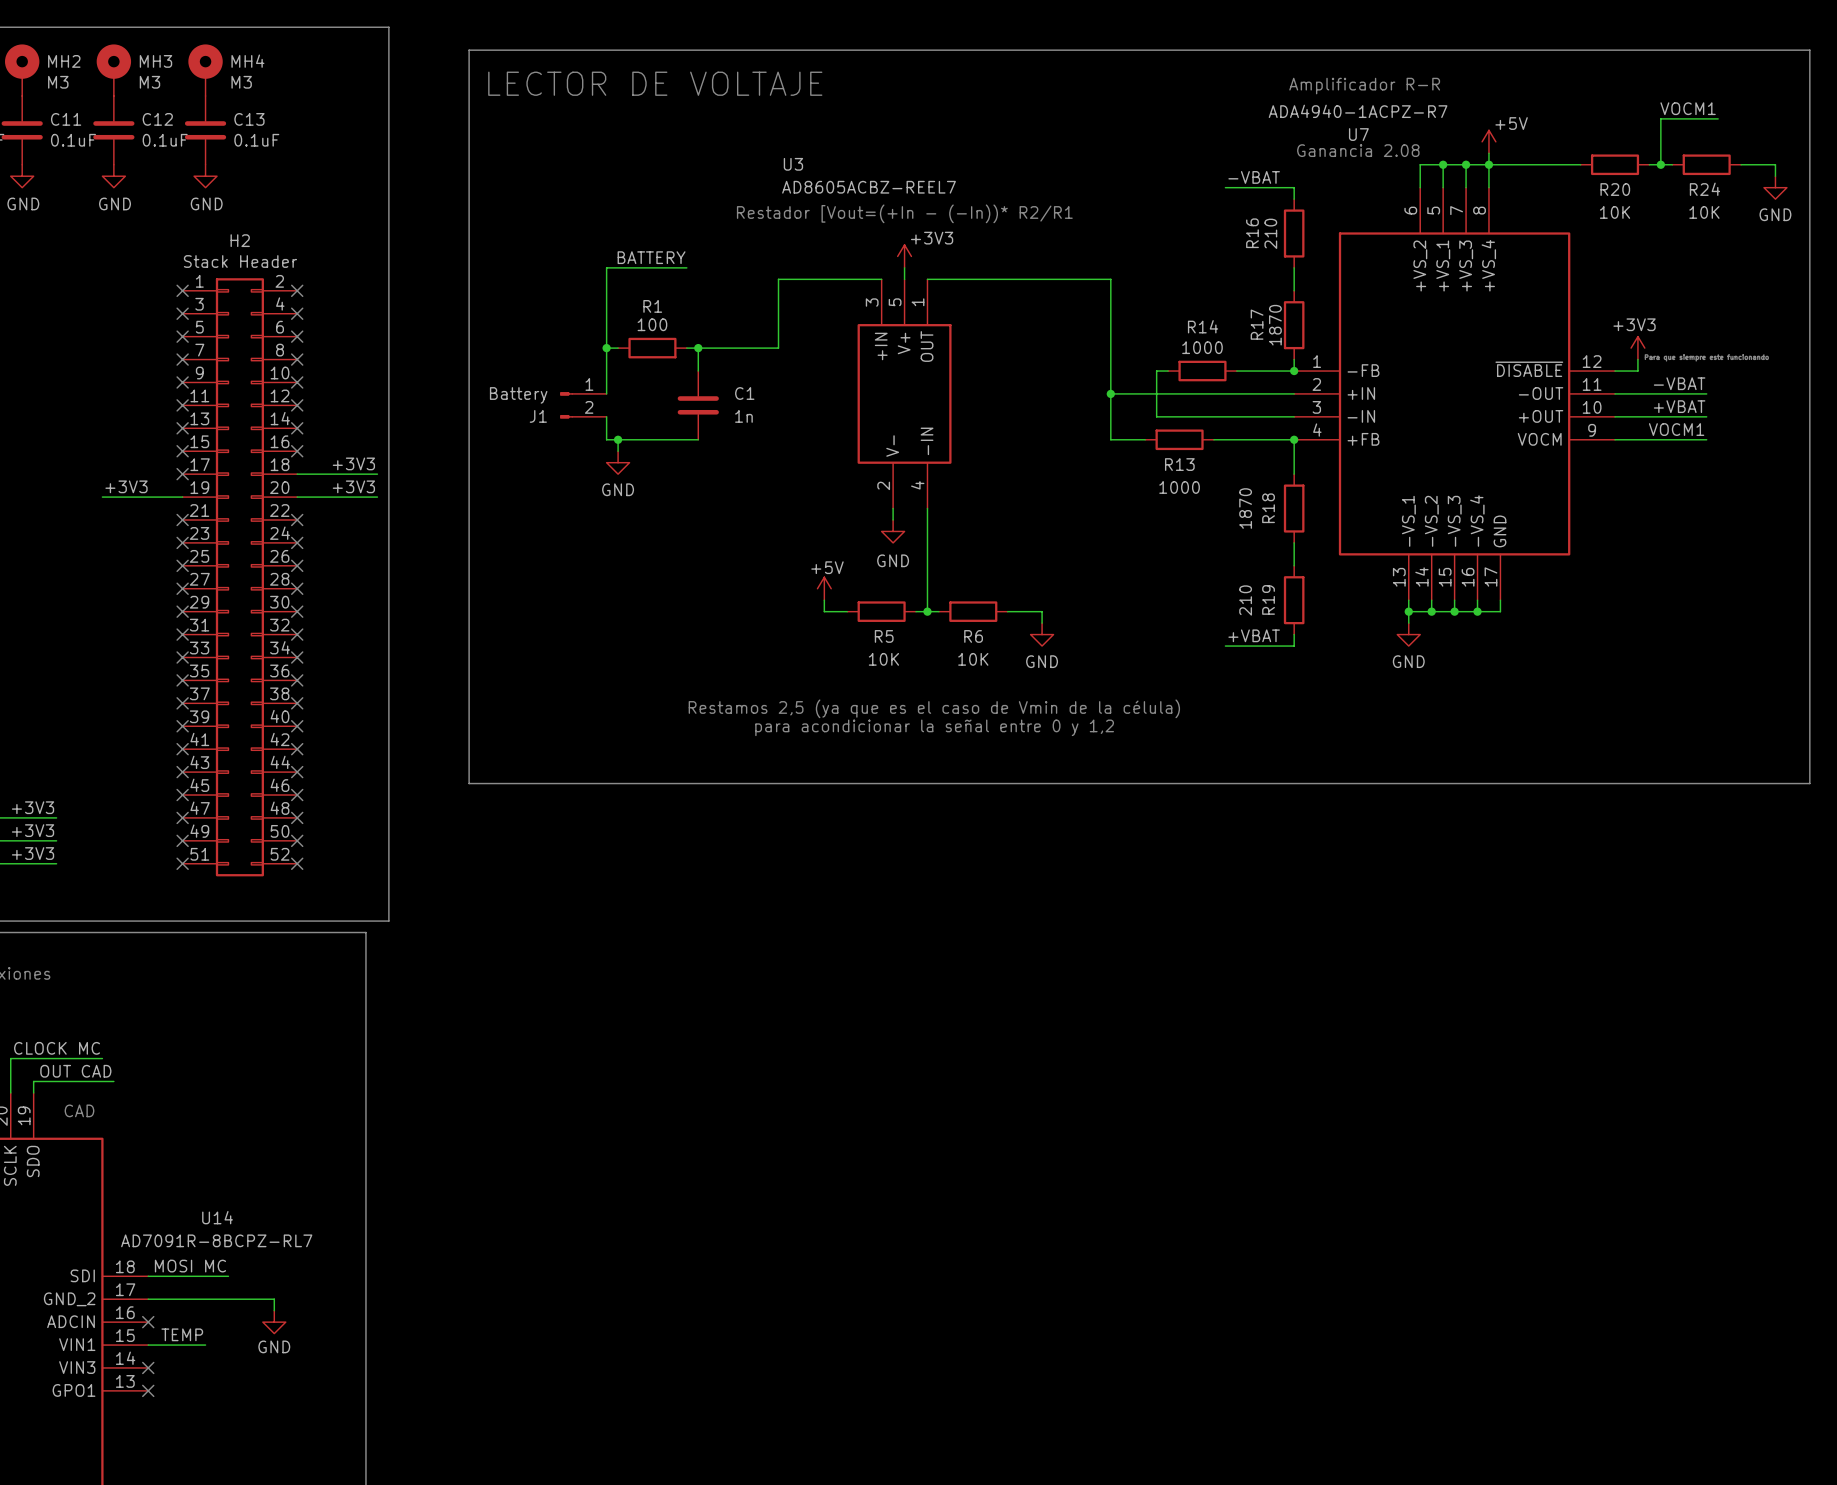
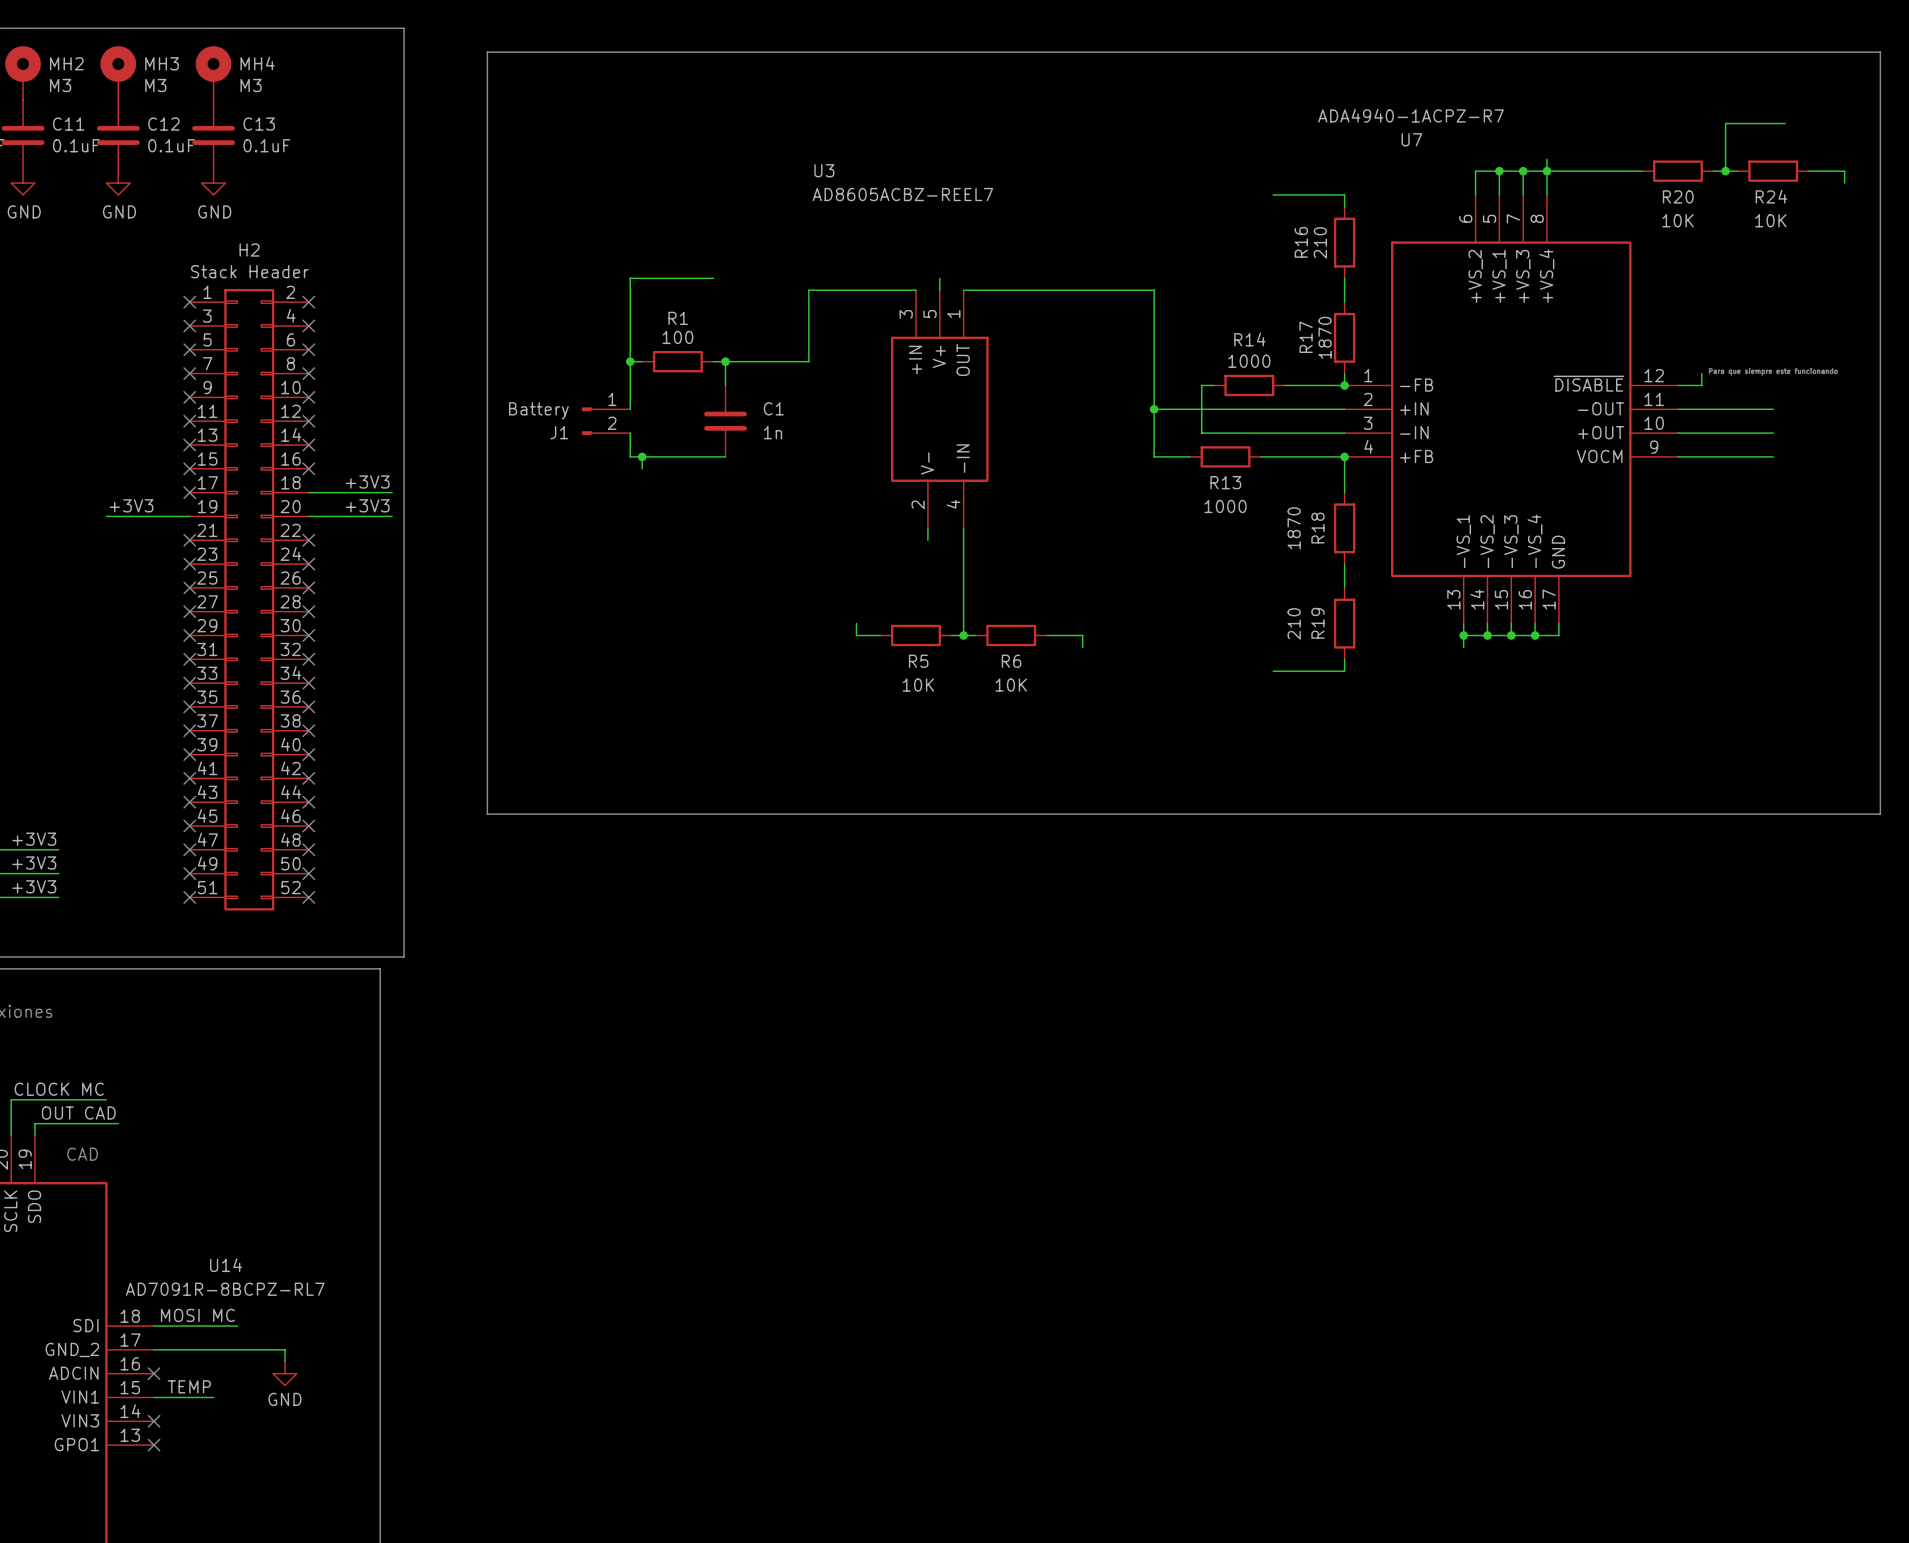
text: LECTOR DE VOLTAJE (655, 83) -> none
text: Amplificador R-R (1364, 86) -> none
label: VOCM1 (1688, 108) -> none
power symbol: +5V (1488, 141) -> none
text: Ganancia 2.08 (1358, 150) -> none
label: -VBAT (1254, 177) -> none
power symbol: GND (1775, 187) -> none
text: Restador [Vout=(+In - (-In))* R2/R1 (904, 213) -> none
power symbol: +3V3 (904, 256) -> none
label: BATTERY (651, 257) -> none
power symbol: +3V3 (1637, 348) -> none
label: -VBAT (1679, 383) -> none
label: +VBAT (1679, 406) -> none
label: VOCM1 (1676, 429) -> none
power symbol: GND (618, 462) -> none
power symbol: GND (893, 531) -> none
power symbol: +5V (824, 588) -> none
power symbol: GND (1042, 634) -> none
power symbol: GND (1408, 634) -> none
label: +VBAT (1254, 635) -> none
text: Restamos 2,5 (ya que es el caso de Vmin de la célula) (934, 708) -> none
text: para acondicionar la señal entre 0 y 1,2 (934, 727) -> none

